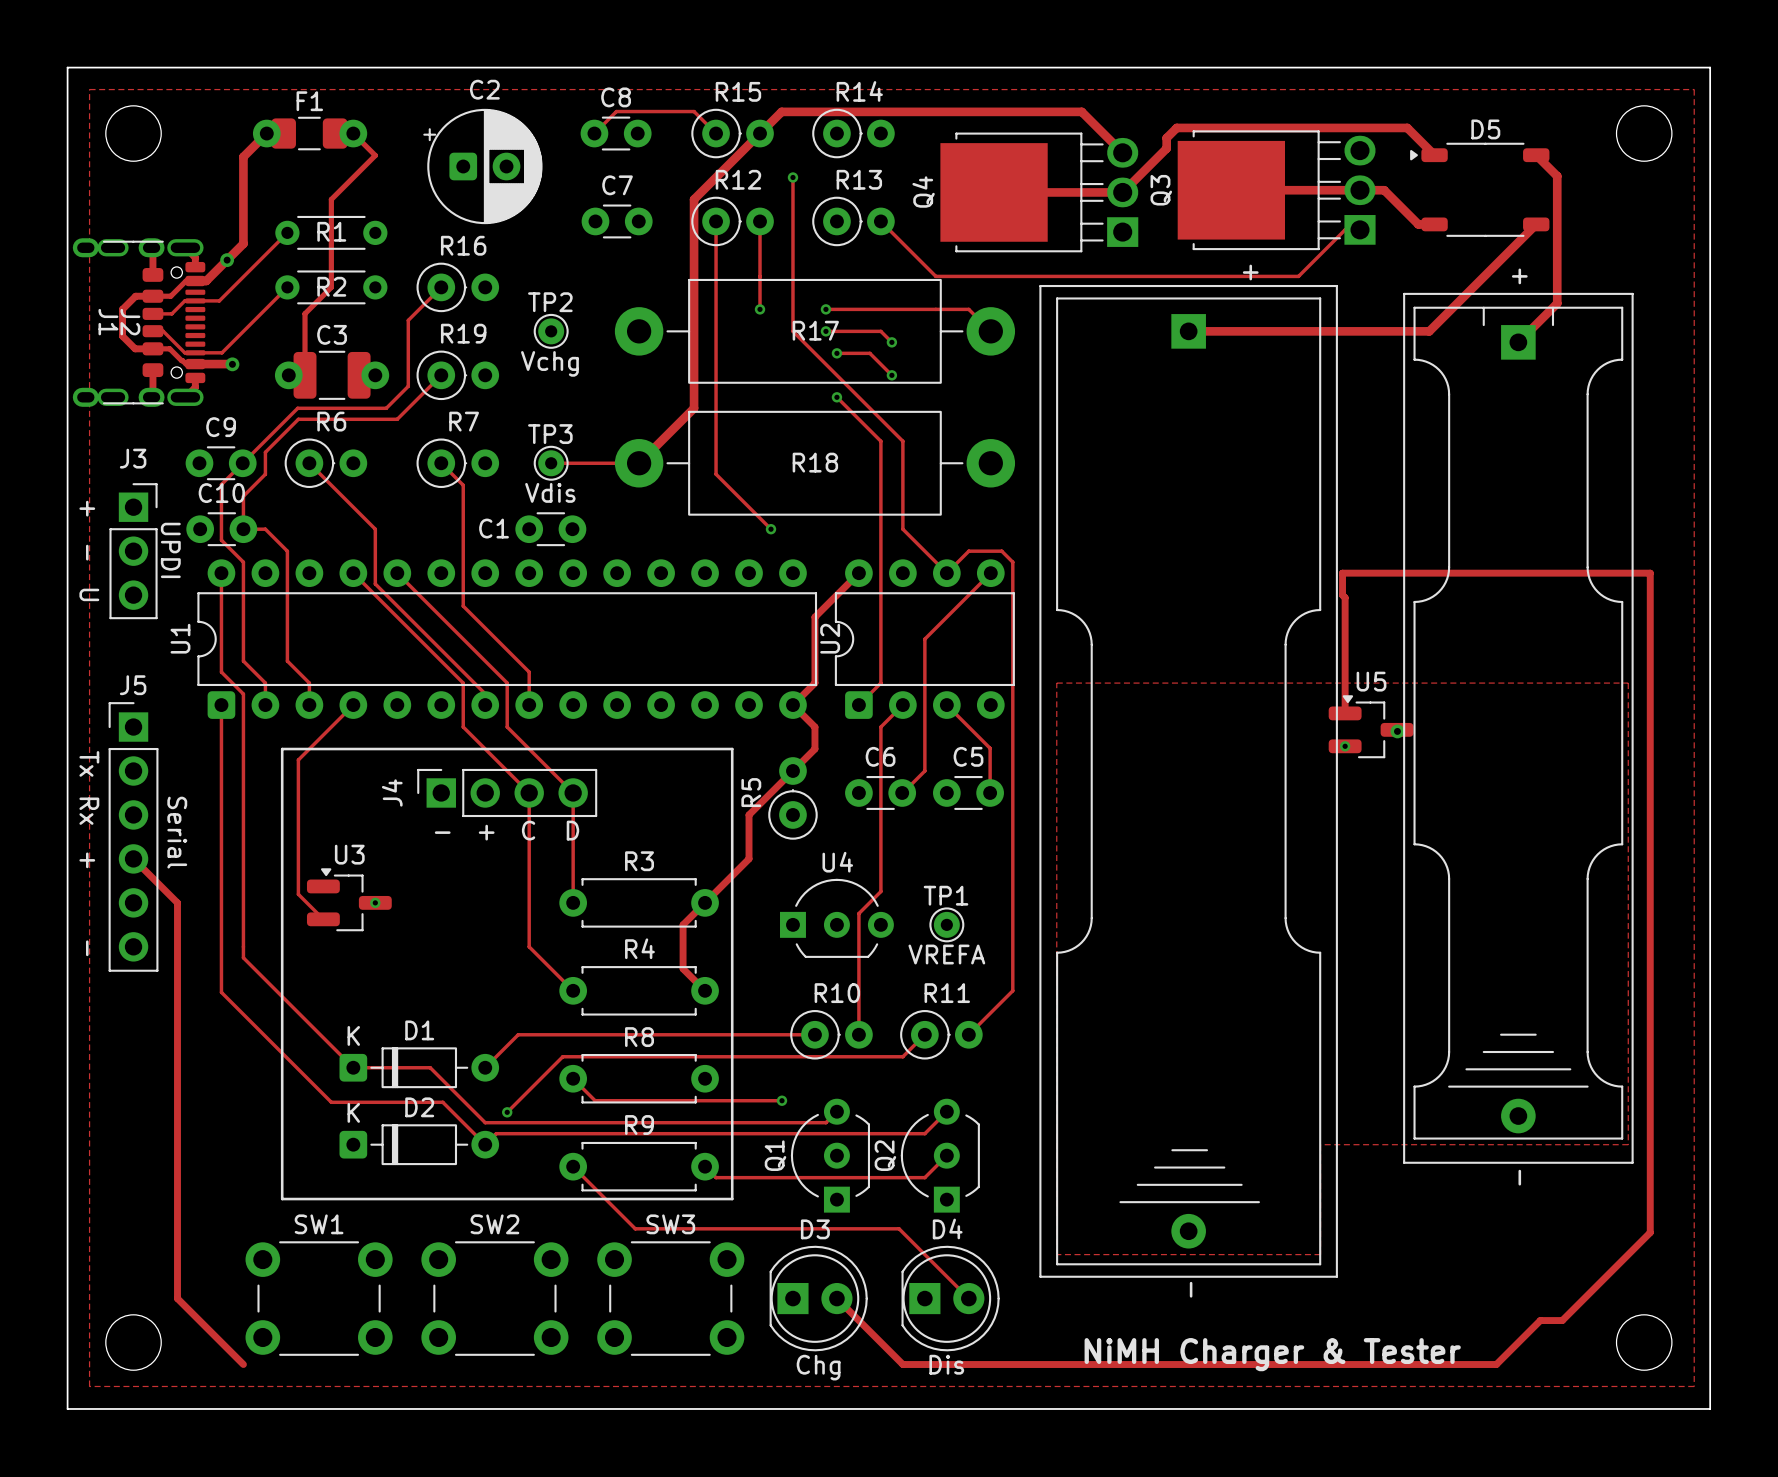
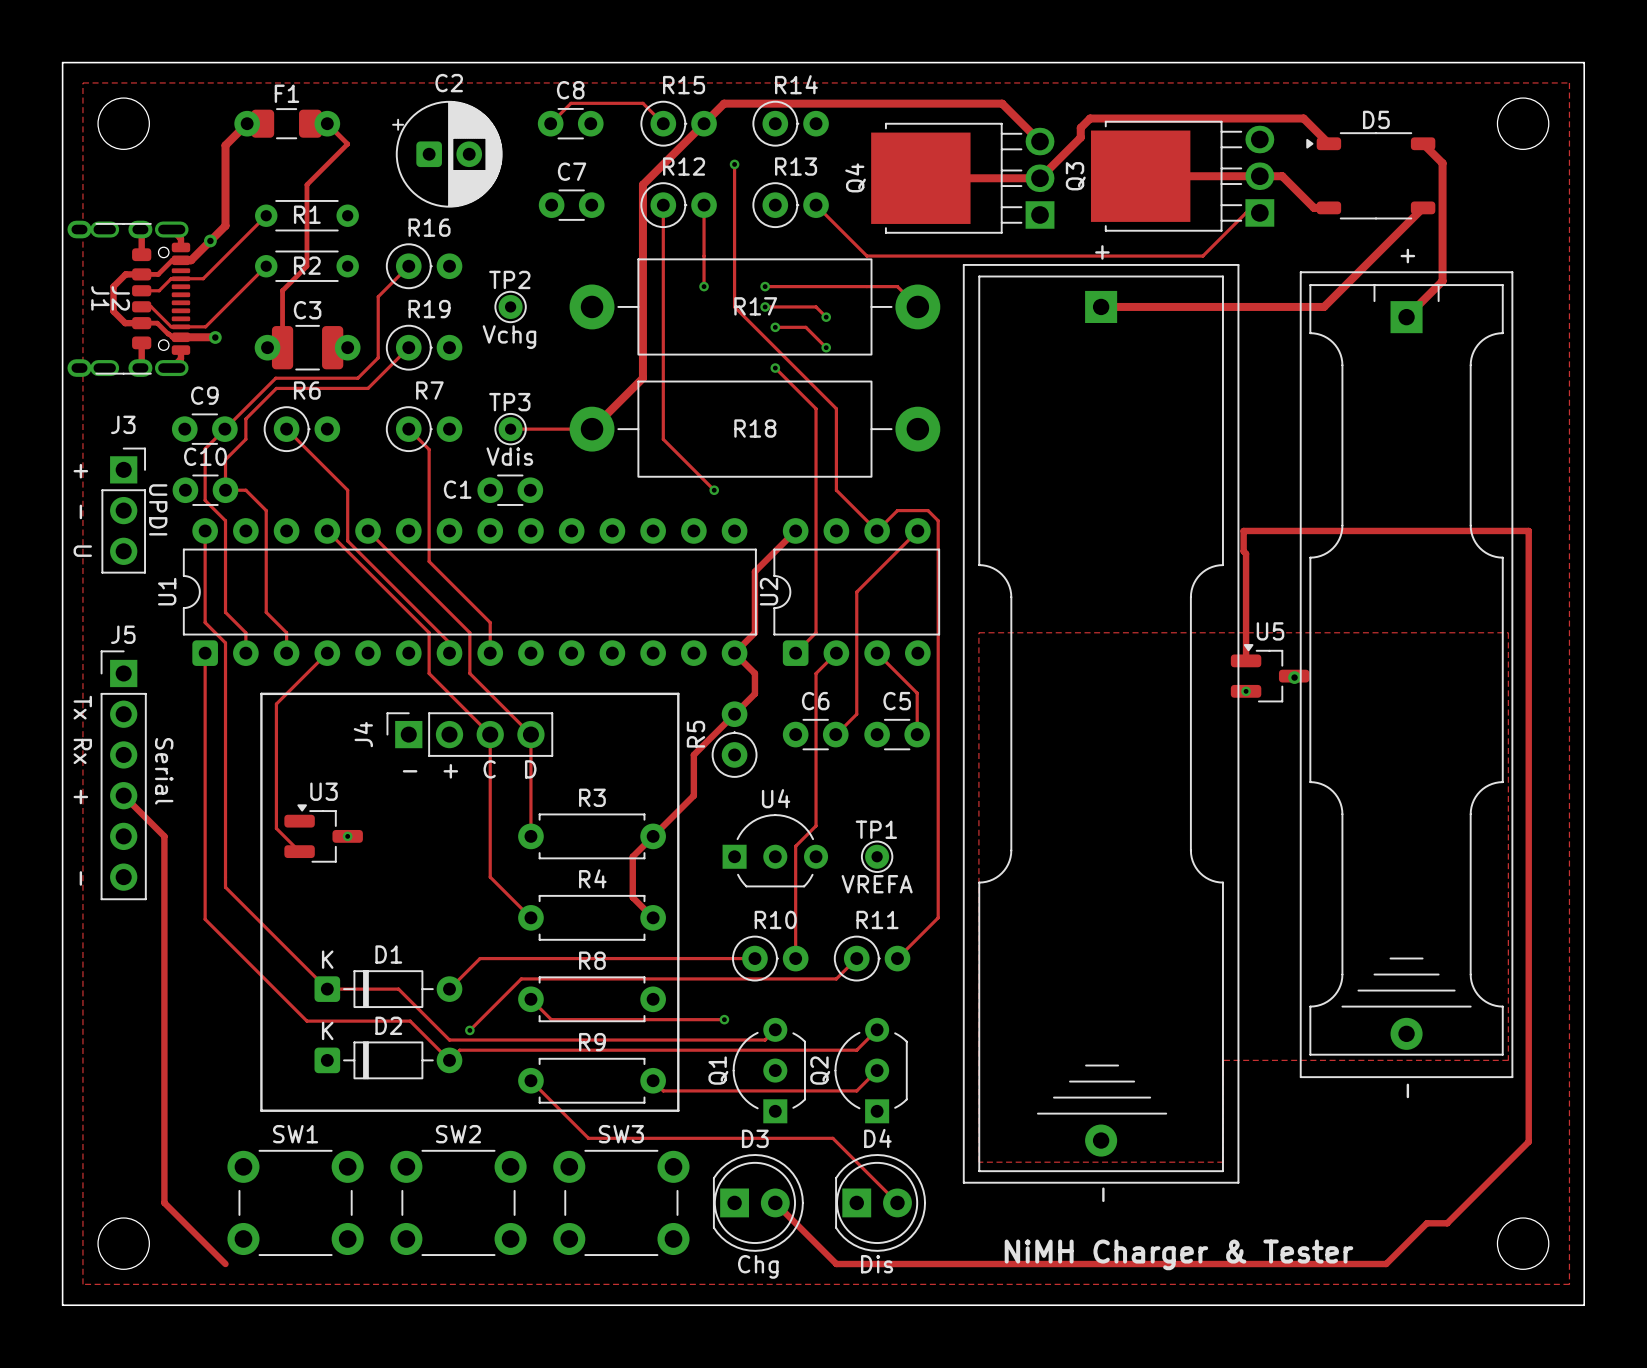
part text position: + (1250, 272) -> + (1102, 252)

